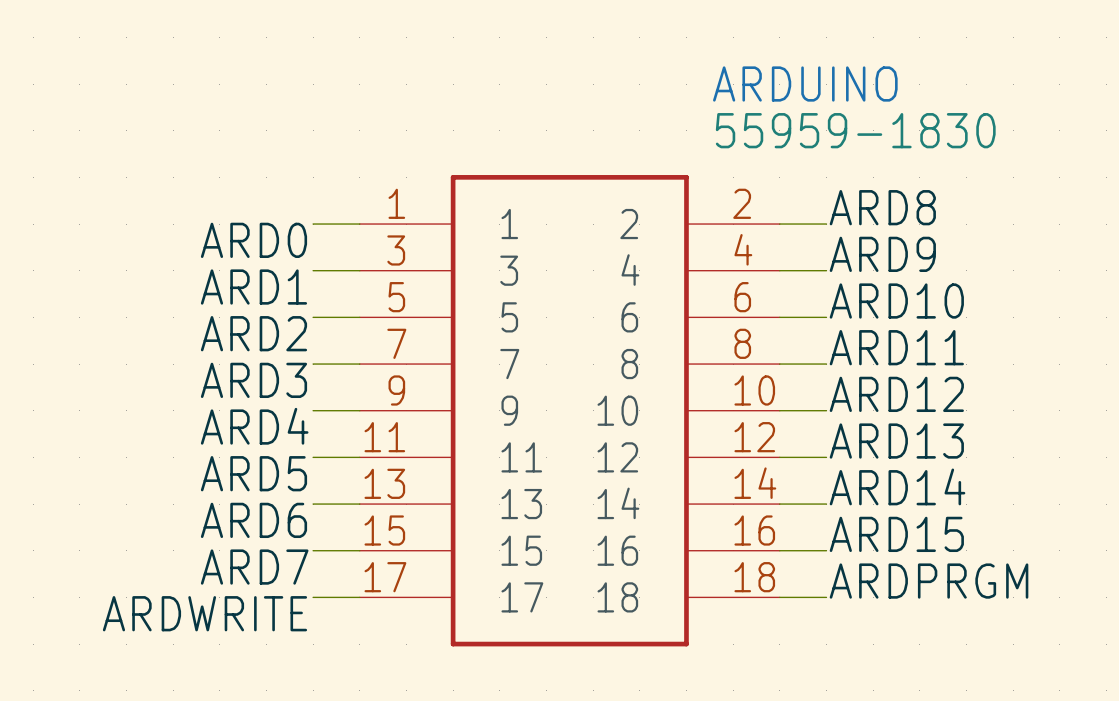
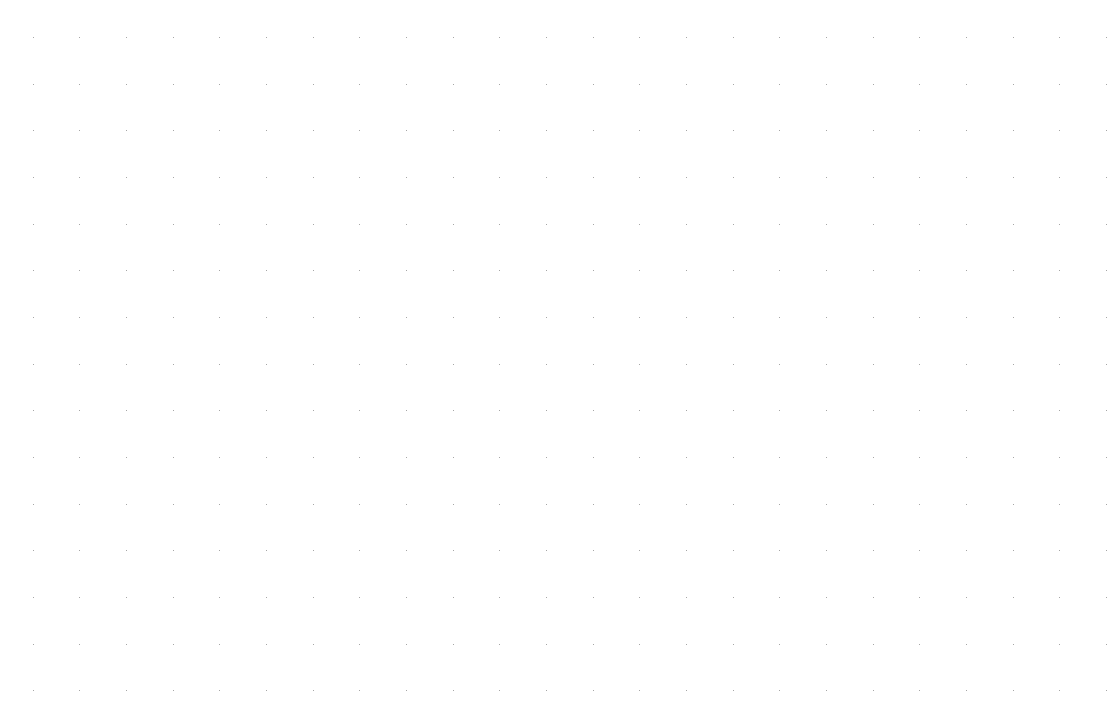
label: ARD8 (882, 207) -> none
wire: (313, 224) (359, 224) -> none
wire: (779, 224) (826, 224) -> none
label: ARD0 (253, 240) -> none
label: ARD9 (882, 254) -> none
wire: (313, 270) (359, 270) -> none
wire: (779, 270) (826, 270) -> none
label: ARD1 (253, 287) -> none
label: ARD10 (896, 301) -> none
wire: (313, 317) (359, 317) -> none
wire: (779, 317) (826, 317) -> none
label: ARD2 (253, 333) -> none
label: ARD11 (896, 347) -> none
wire: (313, 364) (359, 364) -> none
wire: (779, 364) (826, 364) -> none
label: ARD3 (253, 380) -> none
label: ARD12 (896, 394) -> none
wire: (313, 410) (359, 410) -> none
ARDUINO: 55959-1830 (569, 410) -> none
wire: (779, 410) (826, 410) -> none
label: ARD4 (254, 426) -> none
label: ARD13 (896, 441) -> none
wire: (313, 457) (359, 457) -> none
wire: (779, 457) (826, 457) -> none
label: ARD5 (253, 473) -> none
label: ARD14 (897, 486) -> none
wire: (313, 504) (359, 504) -> none
wire: (779, 504) (826, 504) -> none
label: ARD6 (253, 520) -> none
label: ARD15 (896, 534) -> none
wire: (313, 550) (359, 550) -> none
wire: (779, 550) (826, 550) -> none
label: ARD7 (254, 567) -> none
label: ARDPRGM (929, 581) -> none
wire: (313, 597) (359, 597) -> none
wire: (779, 597) (826, 597) -> none
label: ARDWRITE (204, 613) -> none

